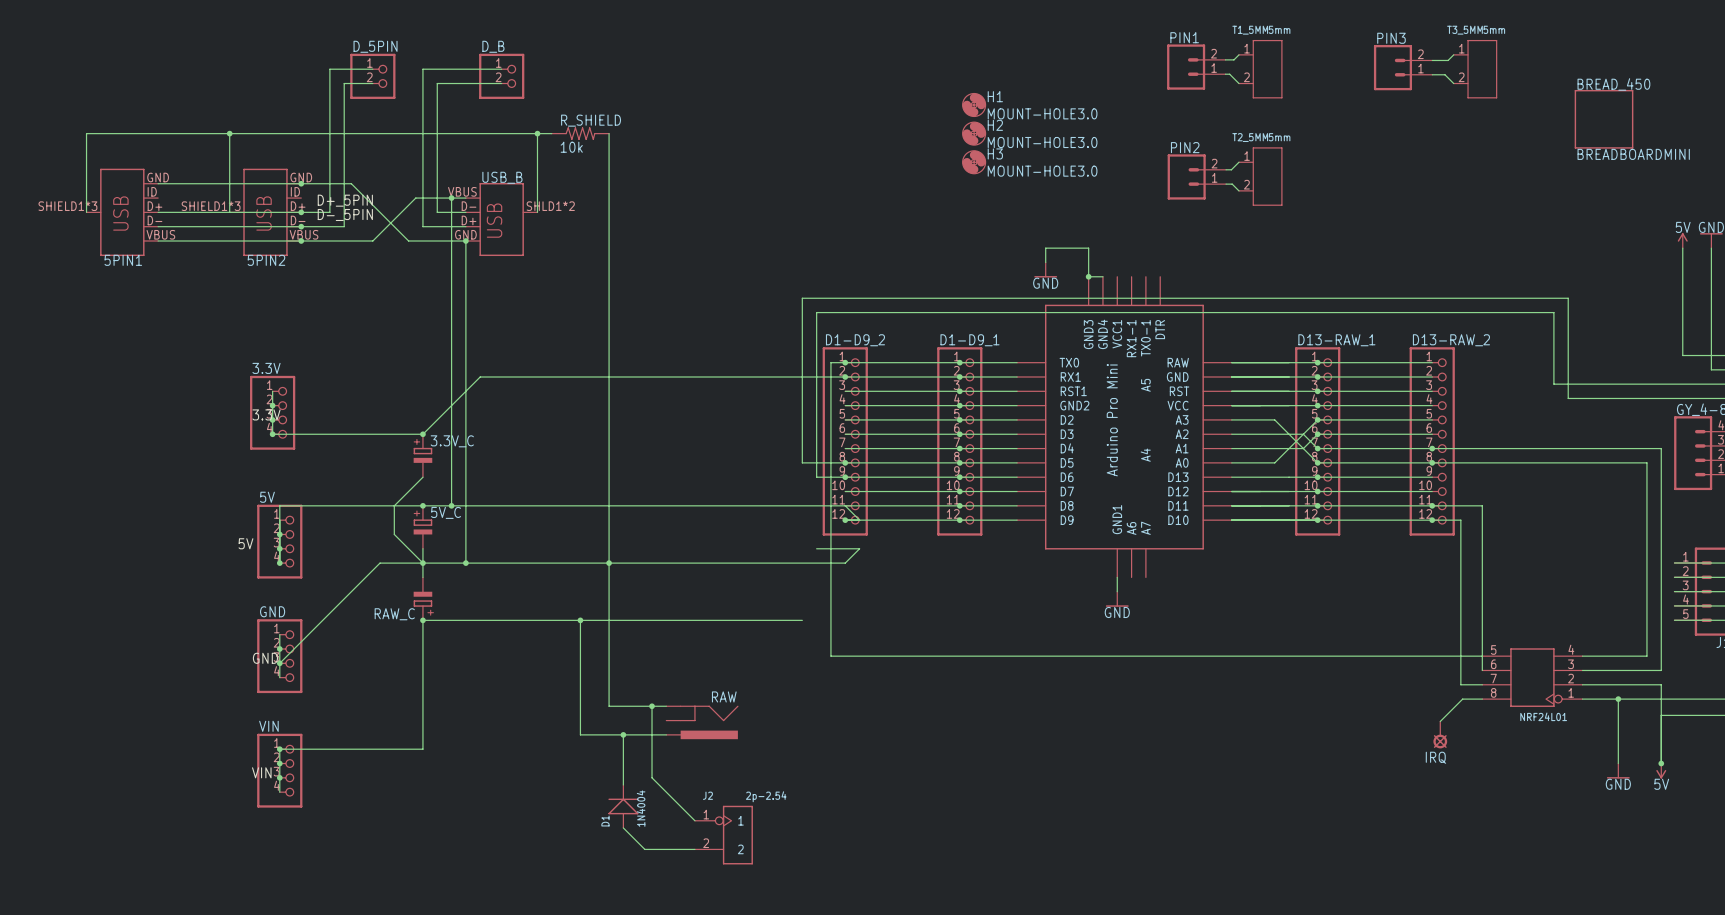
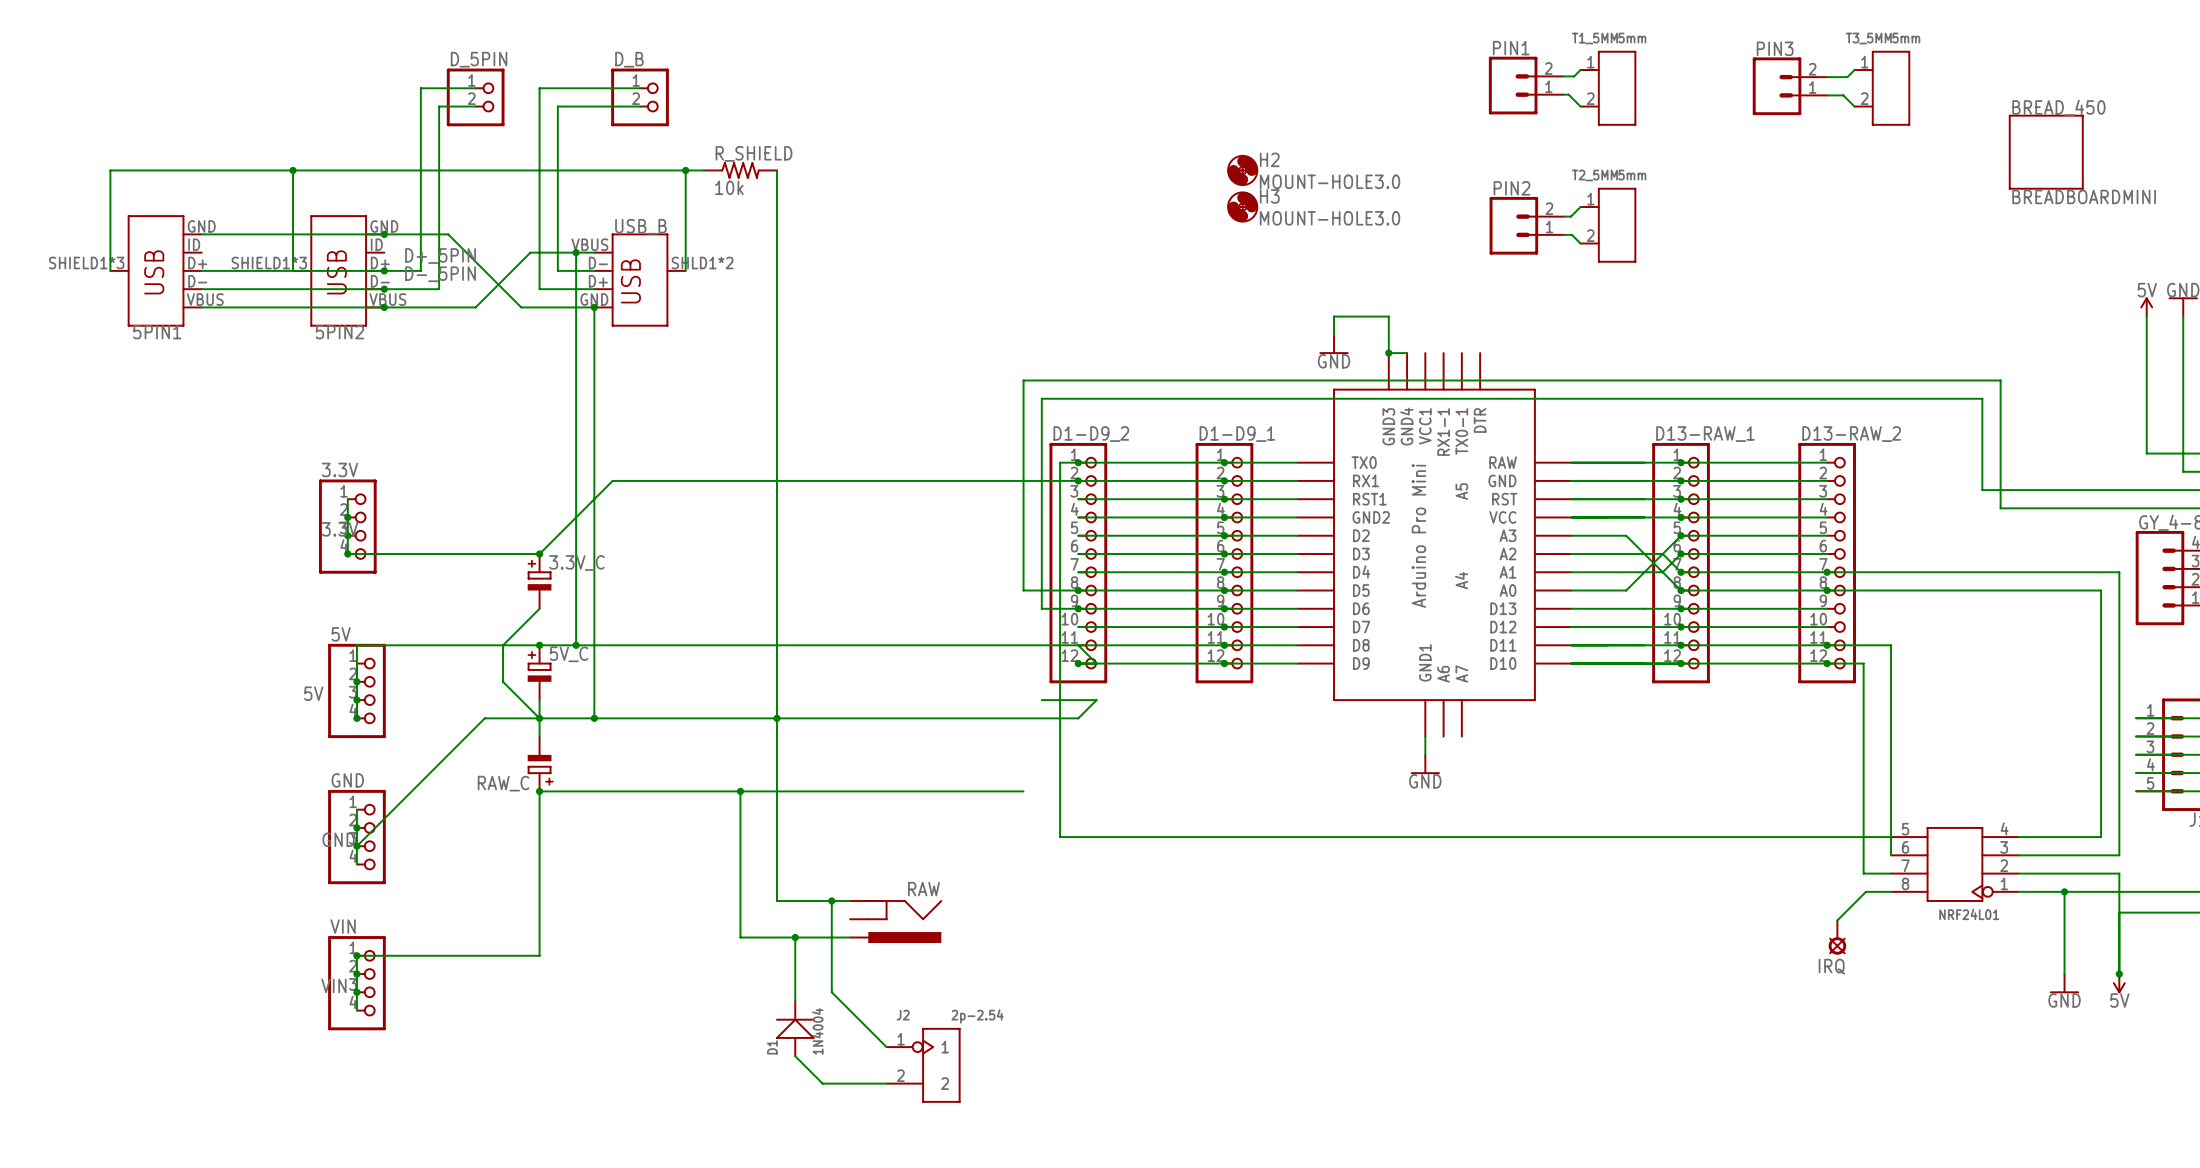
H1: MOUNT-HOLE3.0 (974, 104) -> none

